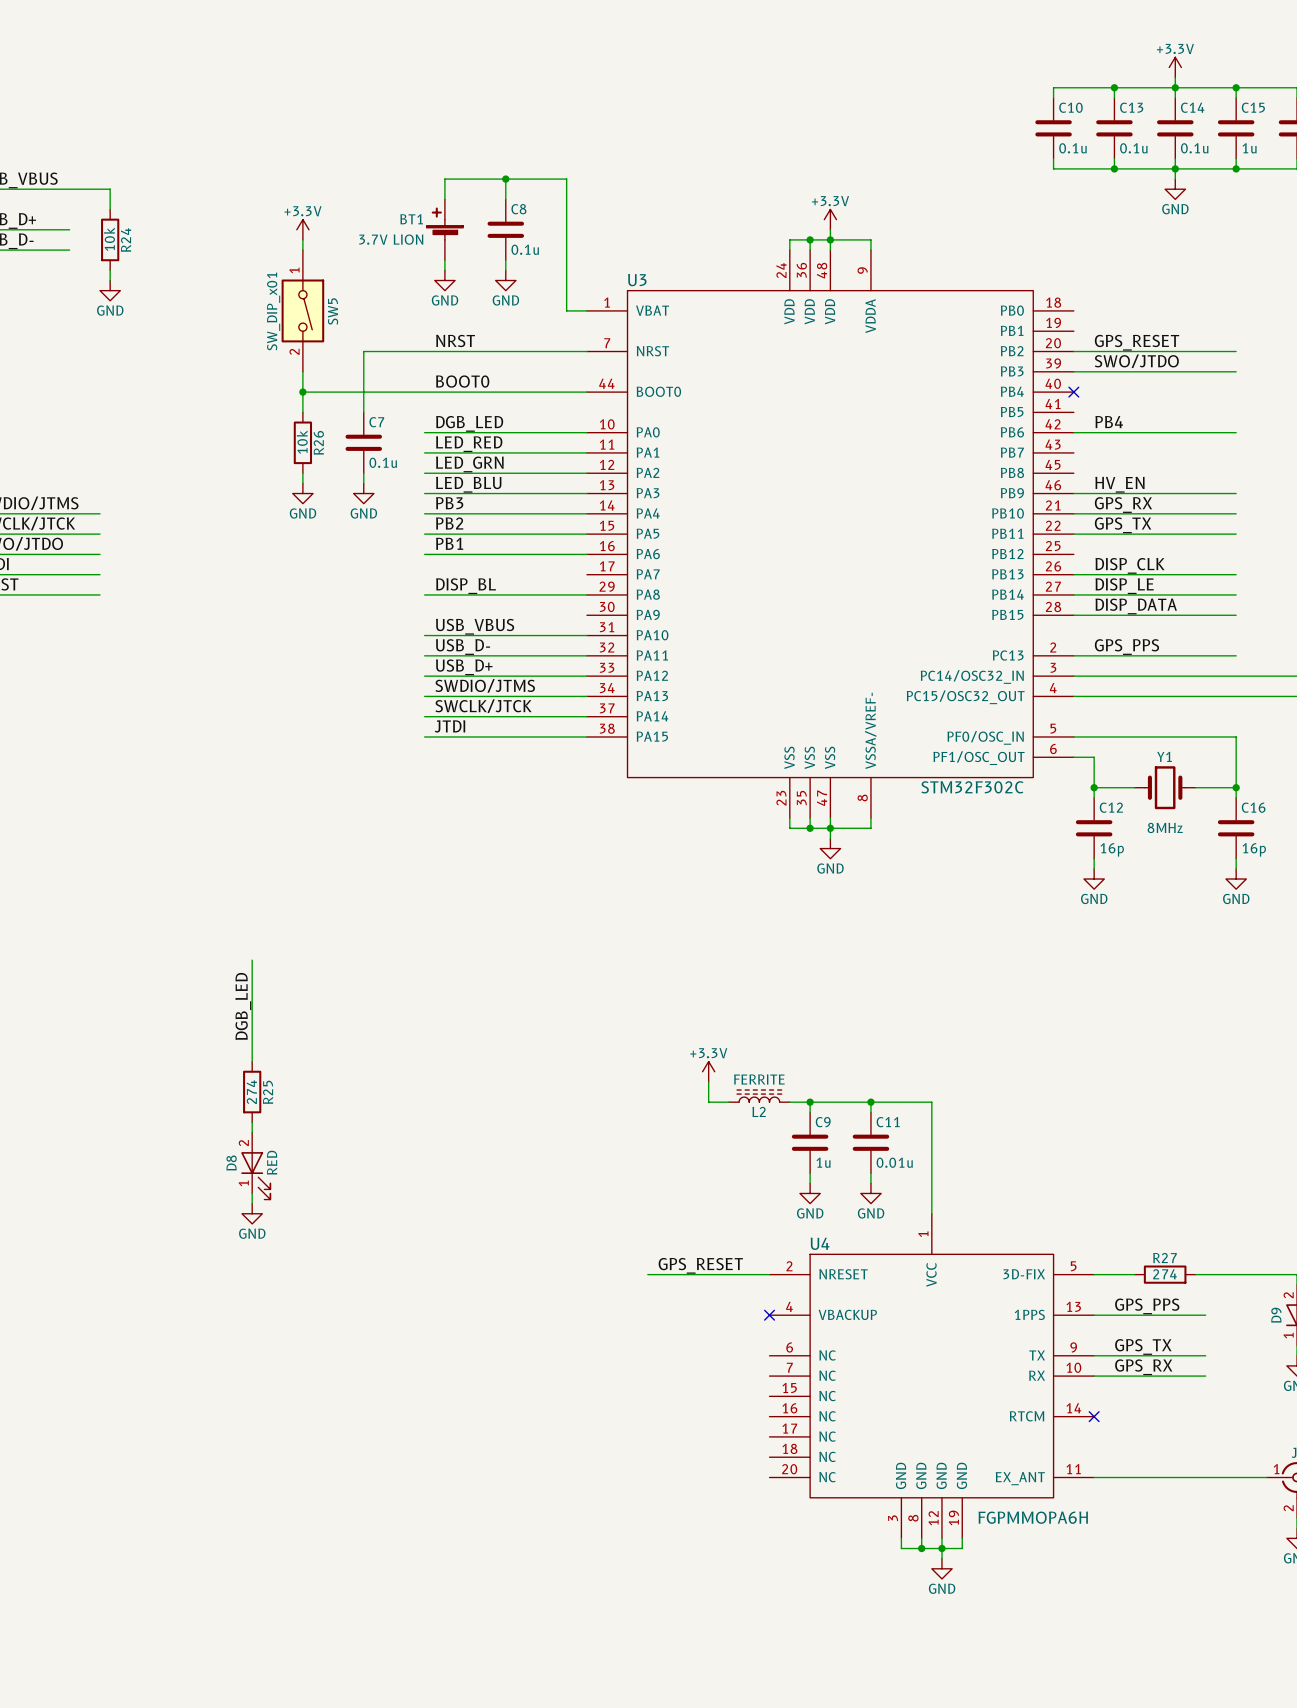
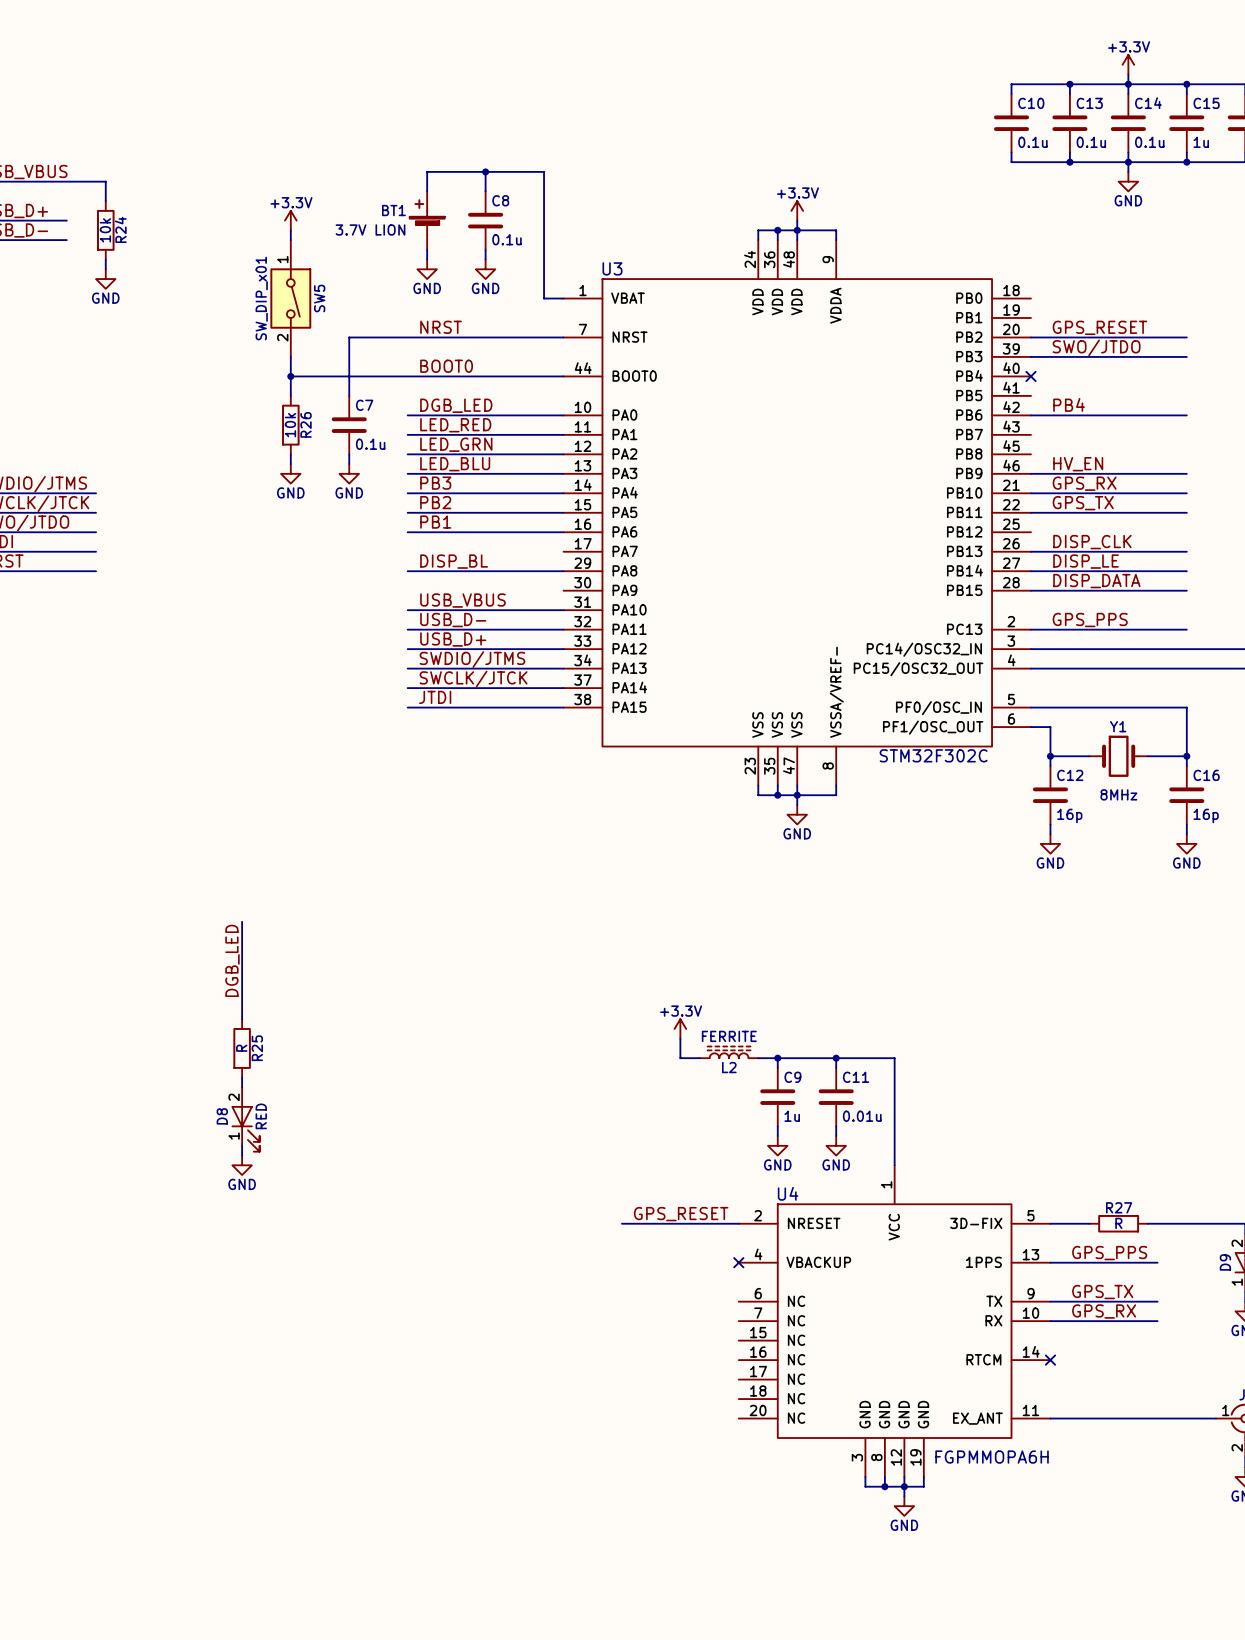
R25 value: 274 (251, 1092) -> R (241, 1048)
R27 value: 274 (1164, 1274) -> R (1118, 1223)

